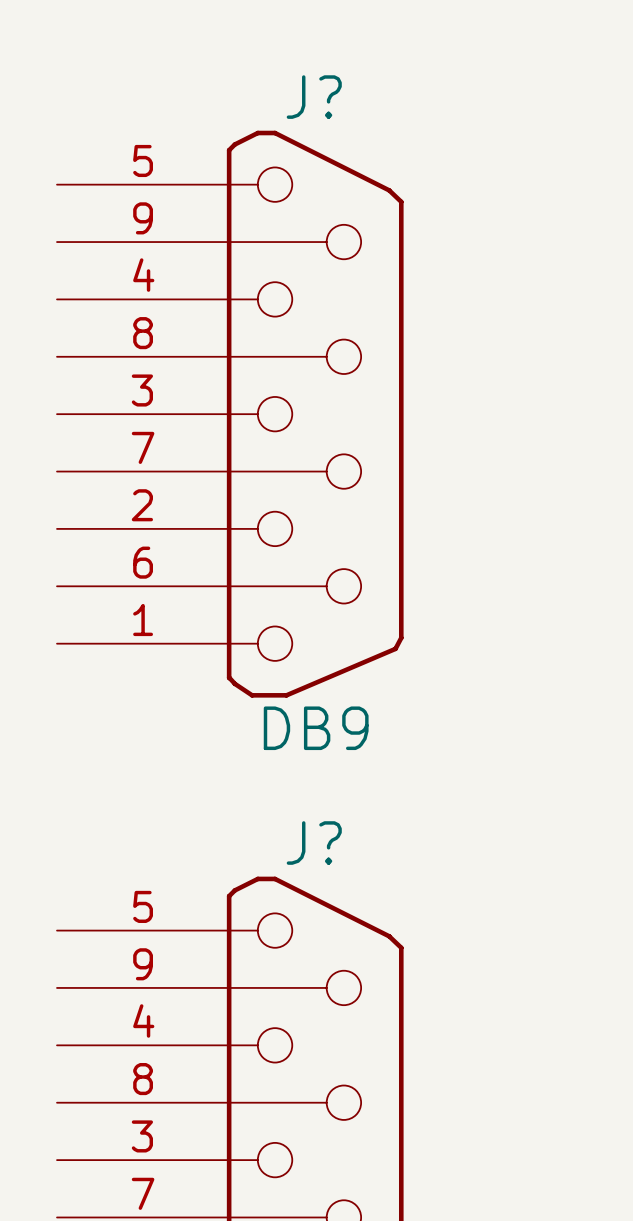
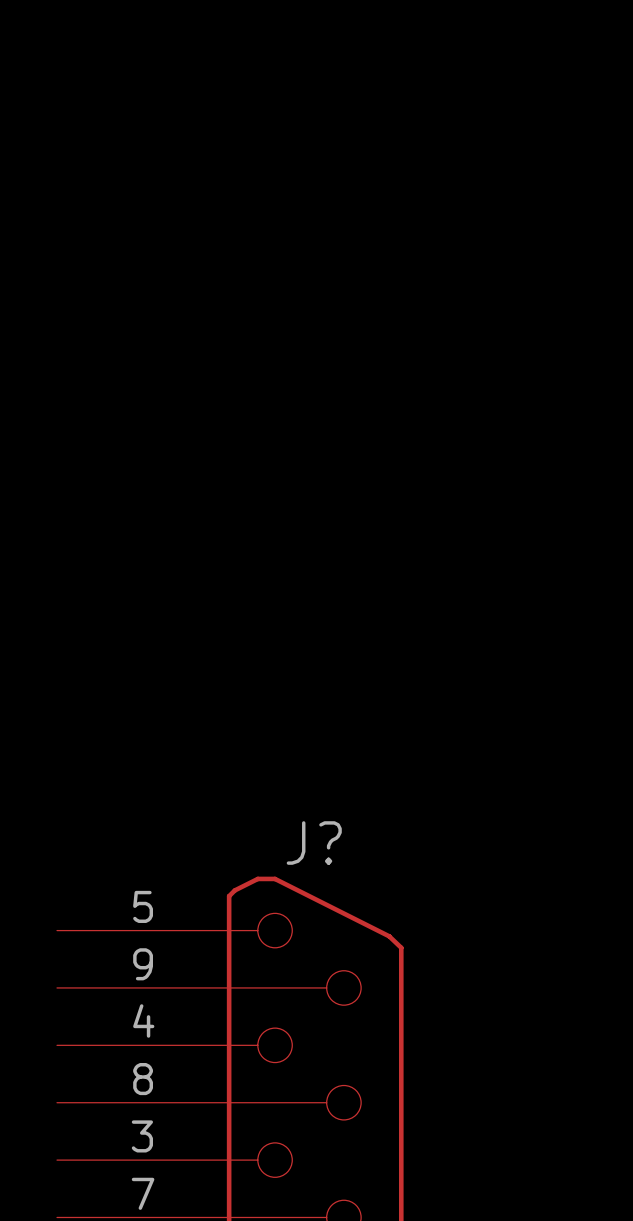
J?: DB9 (230, 414) -> none

